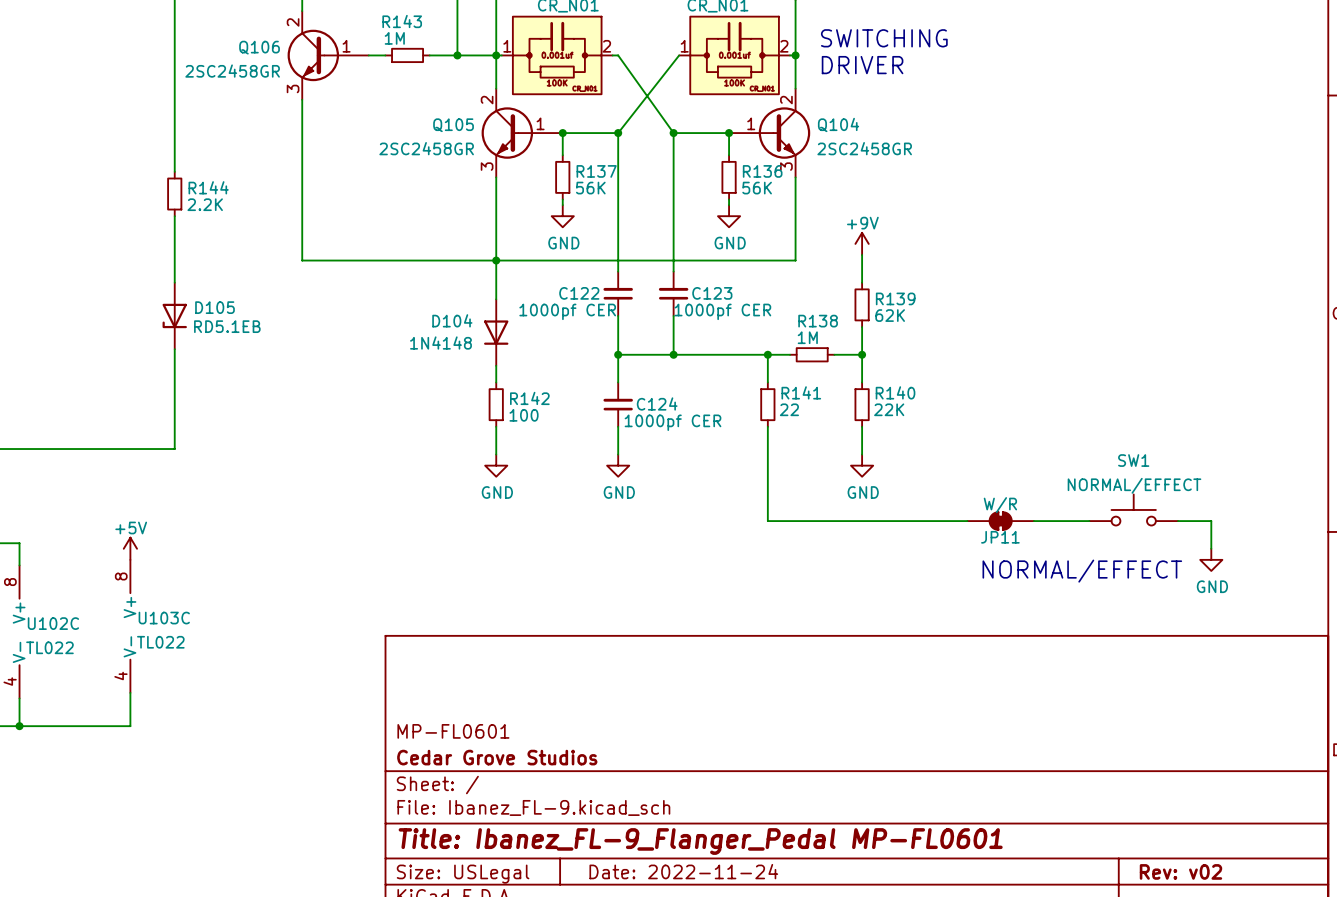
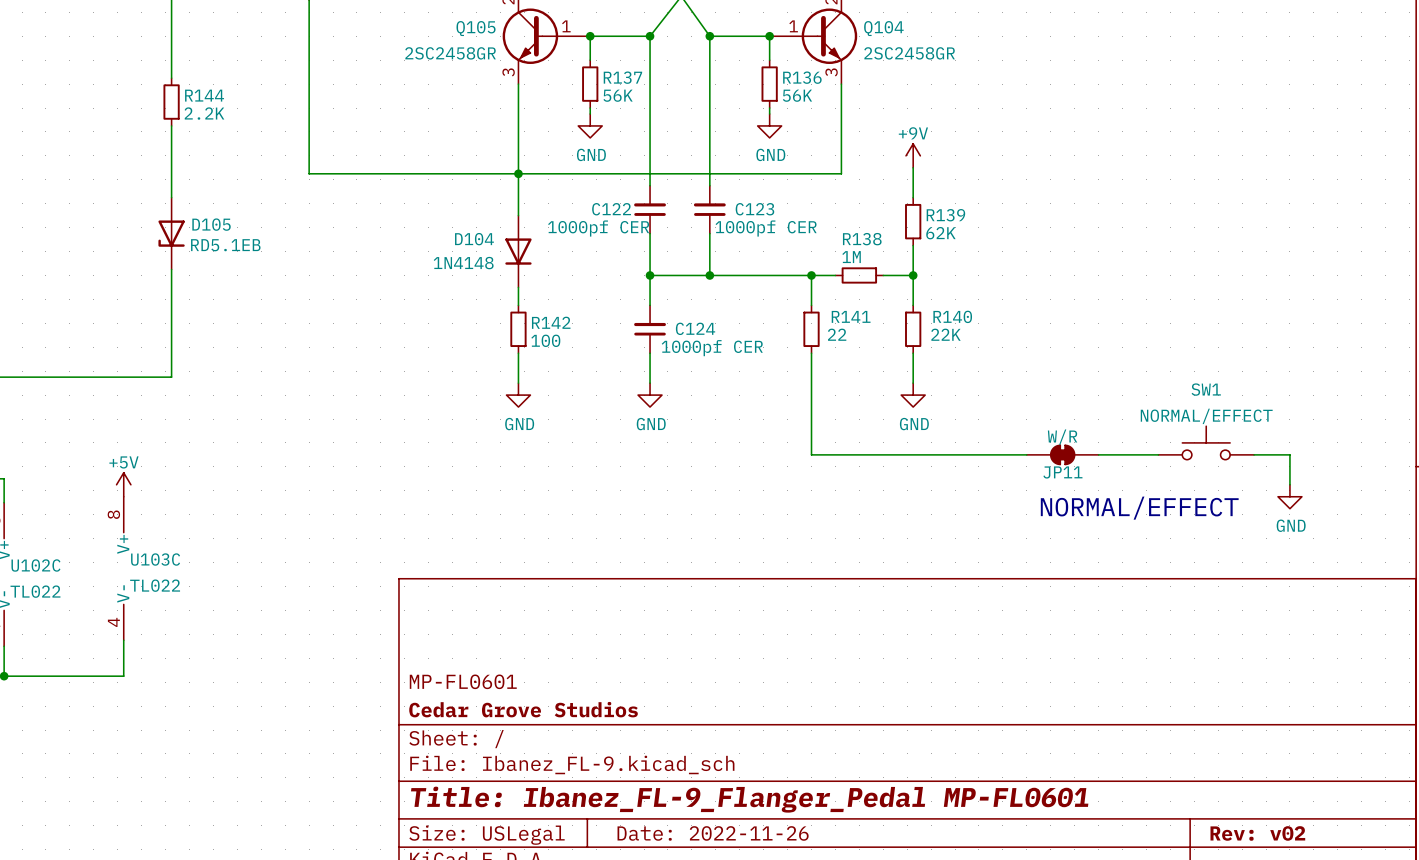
title block: Date: 2022-11-24 (683, 871) -> Date: 2022-11-26 (713, 833)

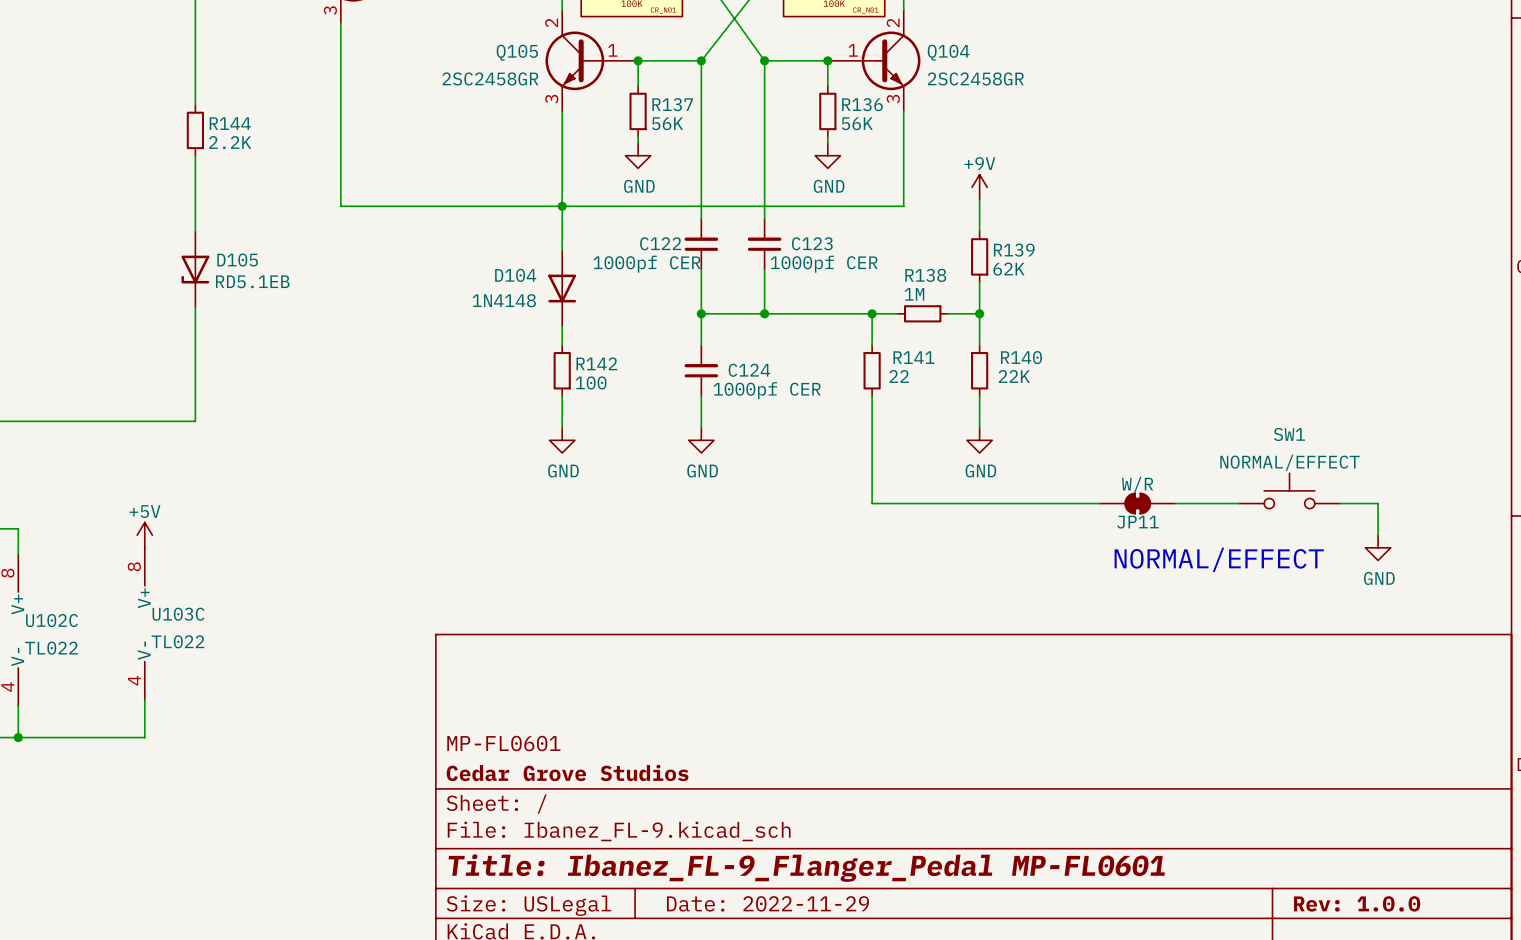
title block: Date: 2022-11-26 (713, 833) -> Date: 2022-11-29 (768, 903)
title block: Rev: v02 (1257, 833) -> Rev: 1.0.0 (1357, 903)

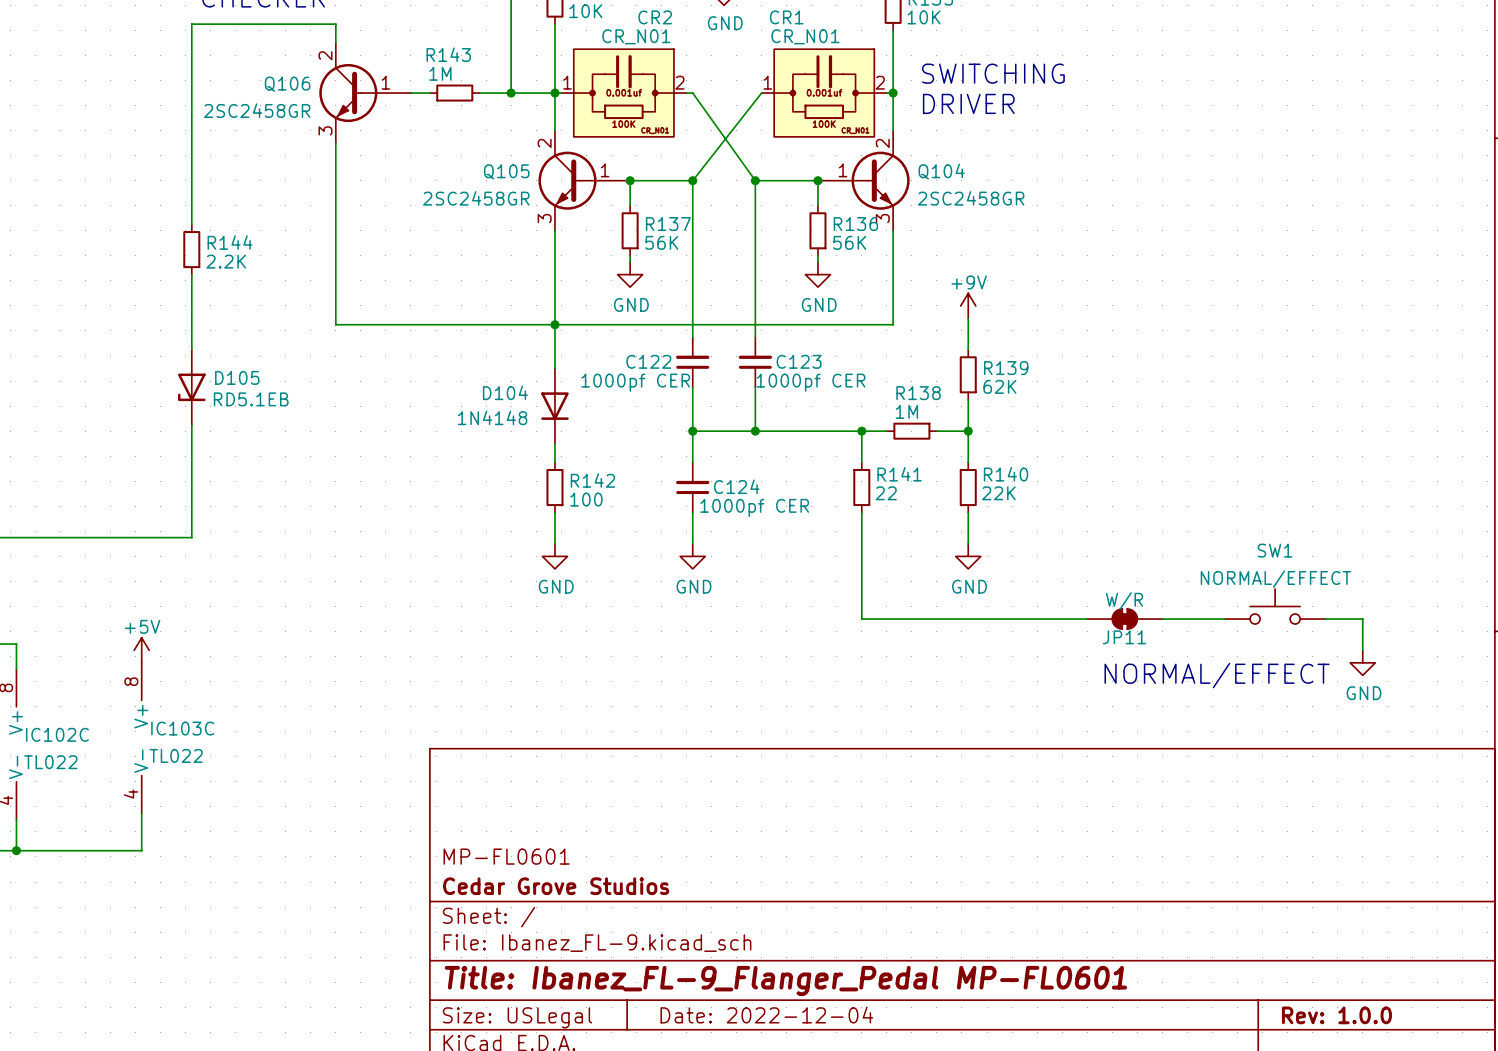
U103C name: U103C (178, 614) -> IC103C (182, 728)
U102C name: U102C (51, 620) -> IC102C (57, 734)
title block: Date: 2022-11-29 (768, 903) -> Date: 2022-12-04 (766, 1015)

